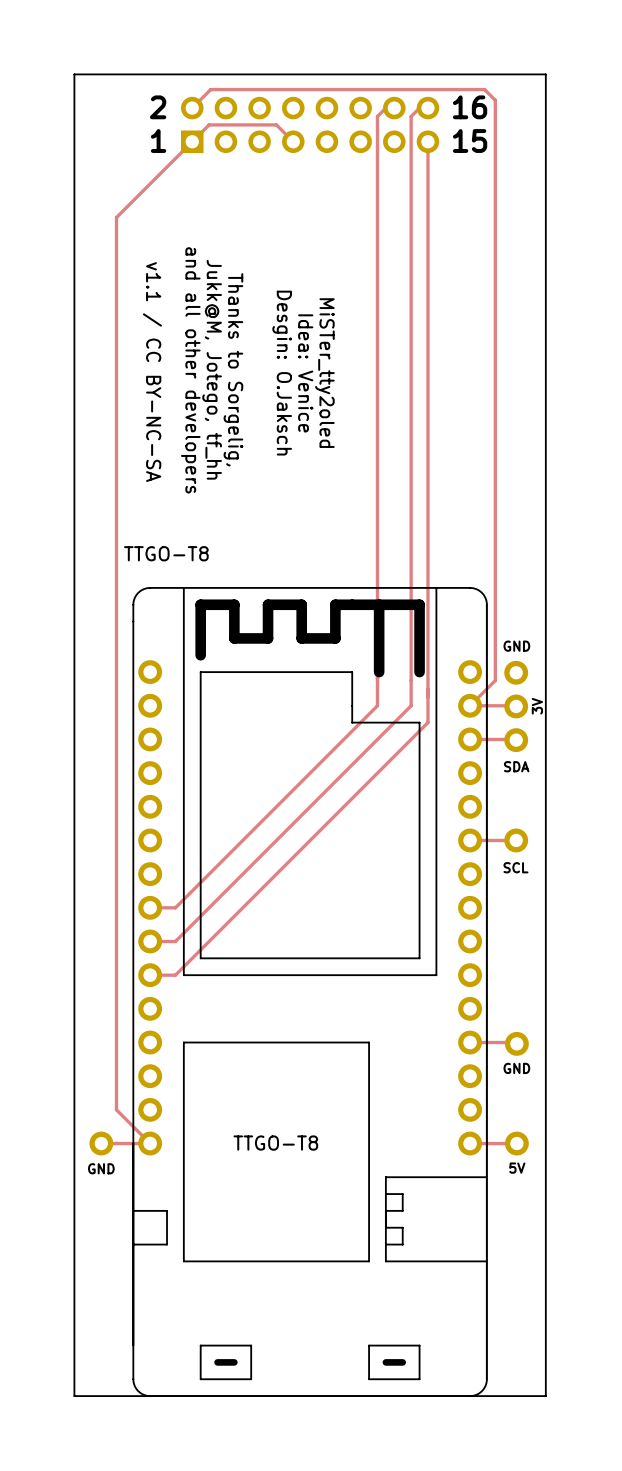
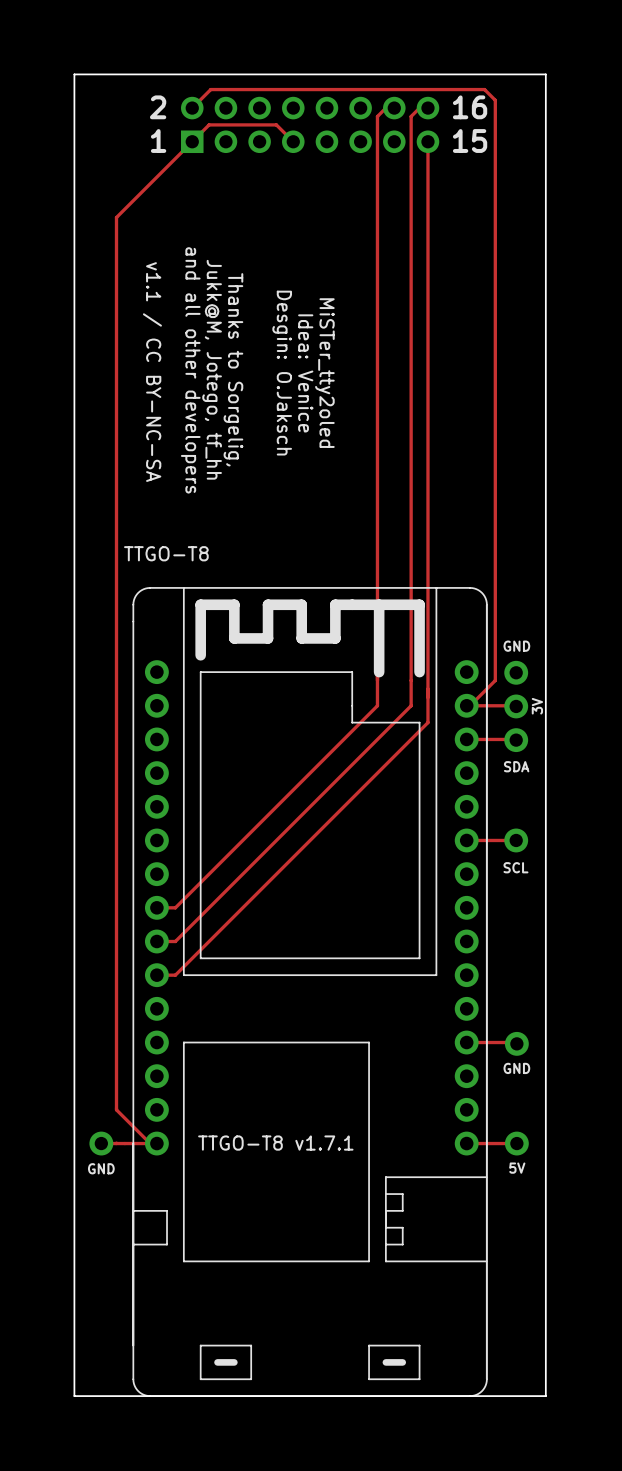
TTGO-T8 footprint: [132, 587, 488, 1397] -> [132, 587, 488, 1397]
TTGO-T8 value: TTGO-T8 (275, 1143) -> TTGO-T8 v1.7.1 (275, 1143)

